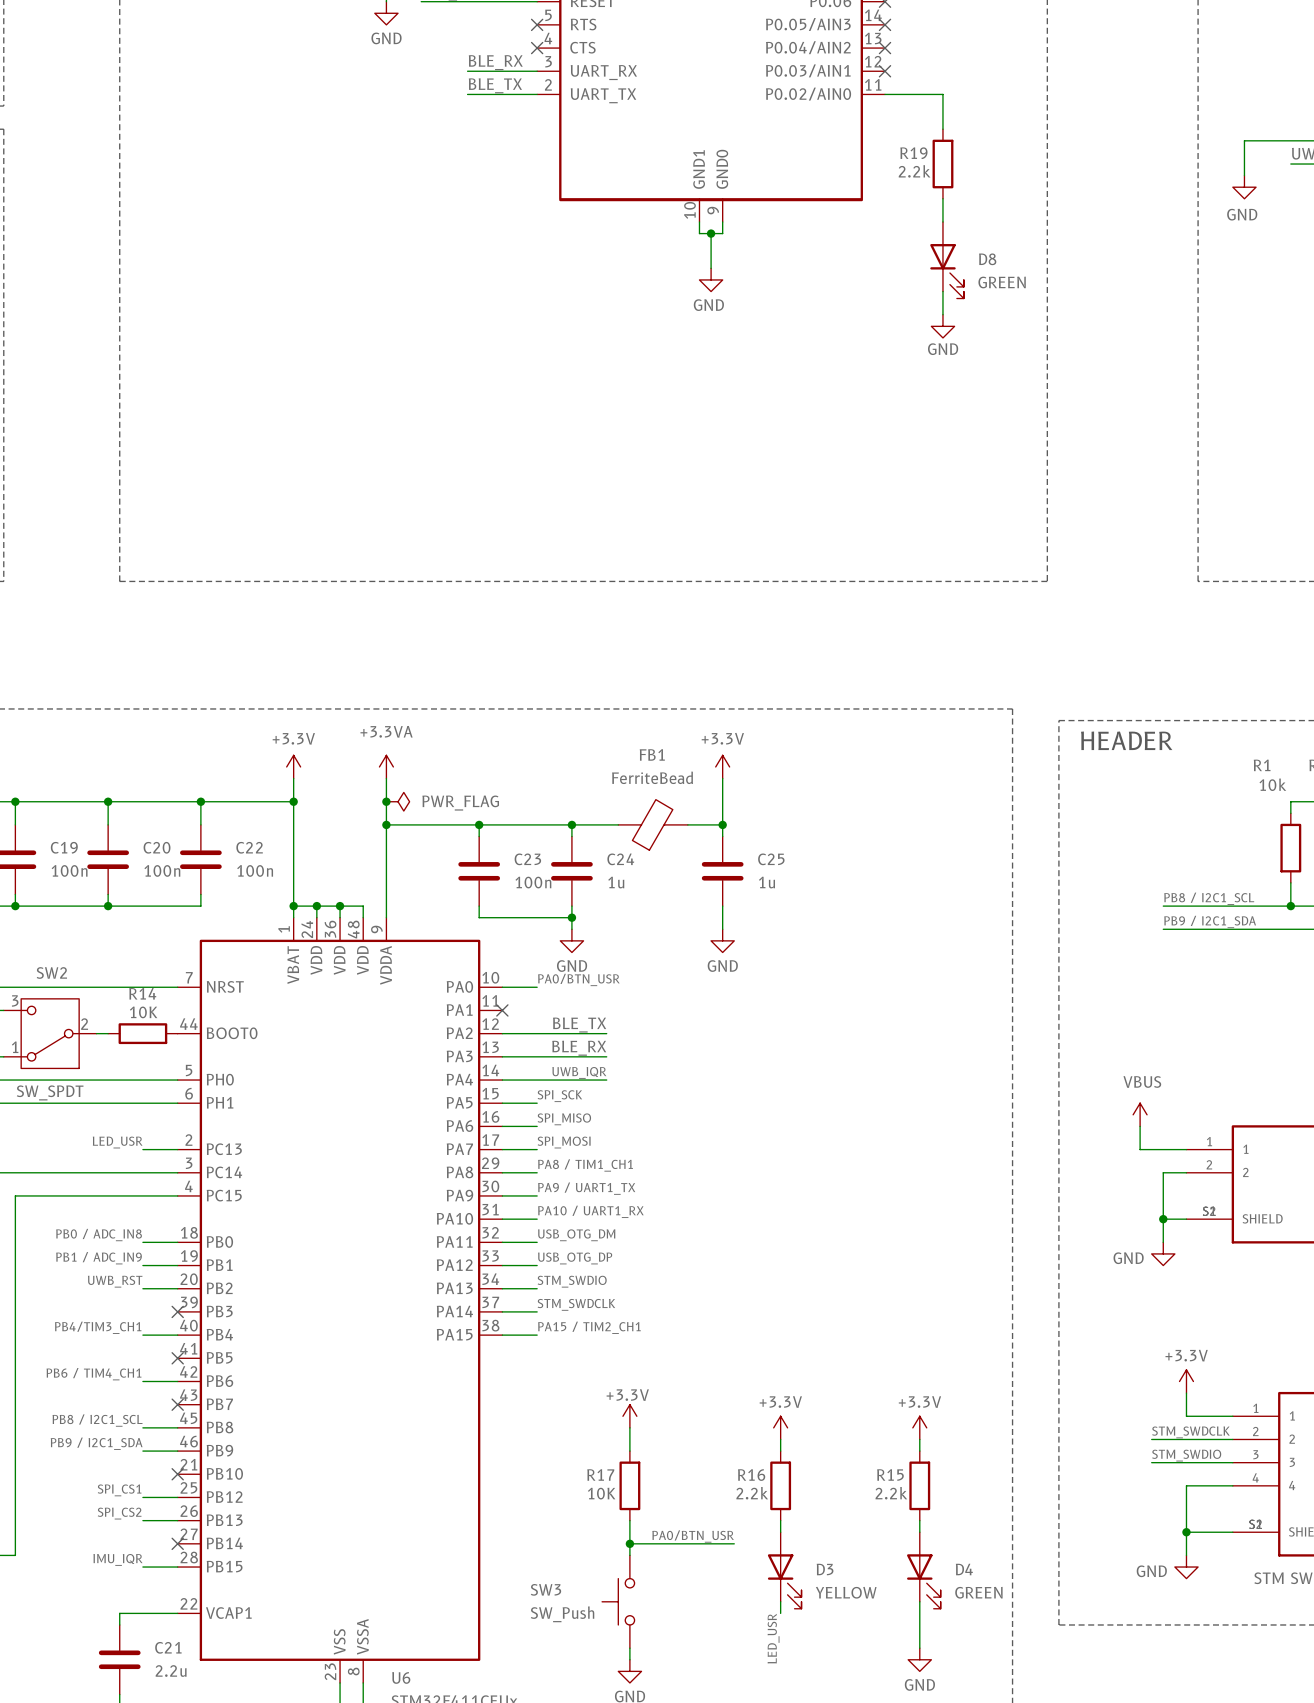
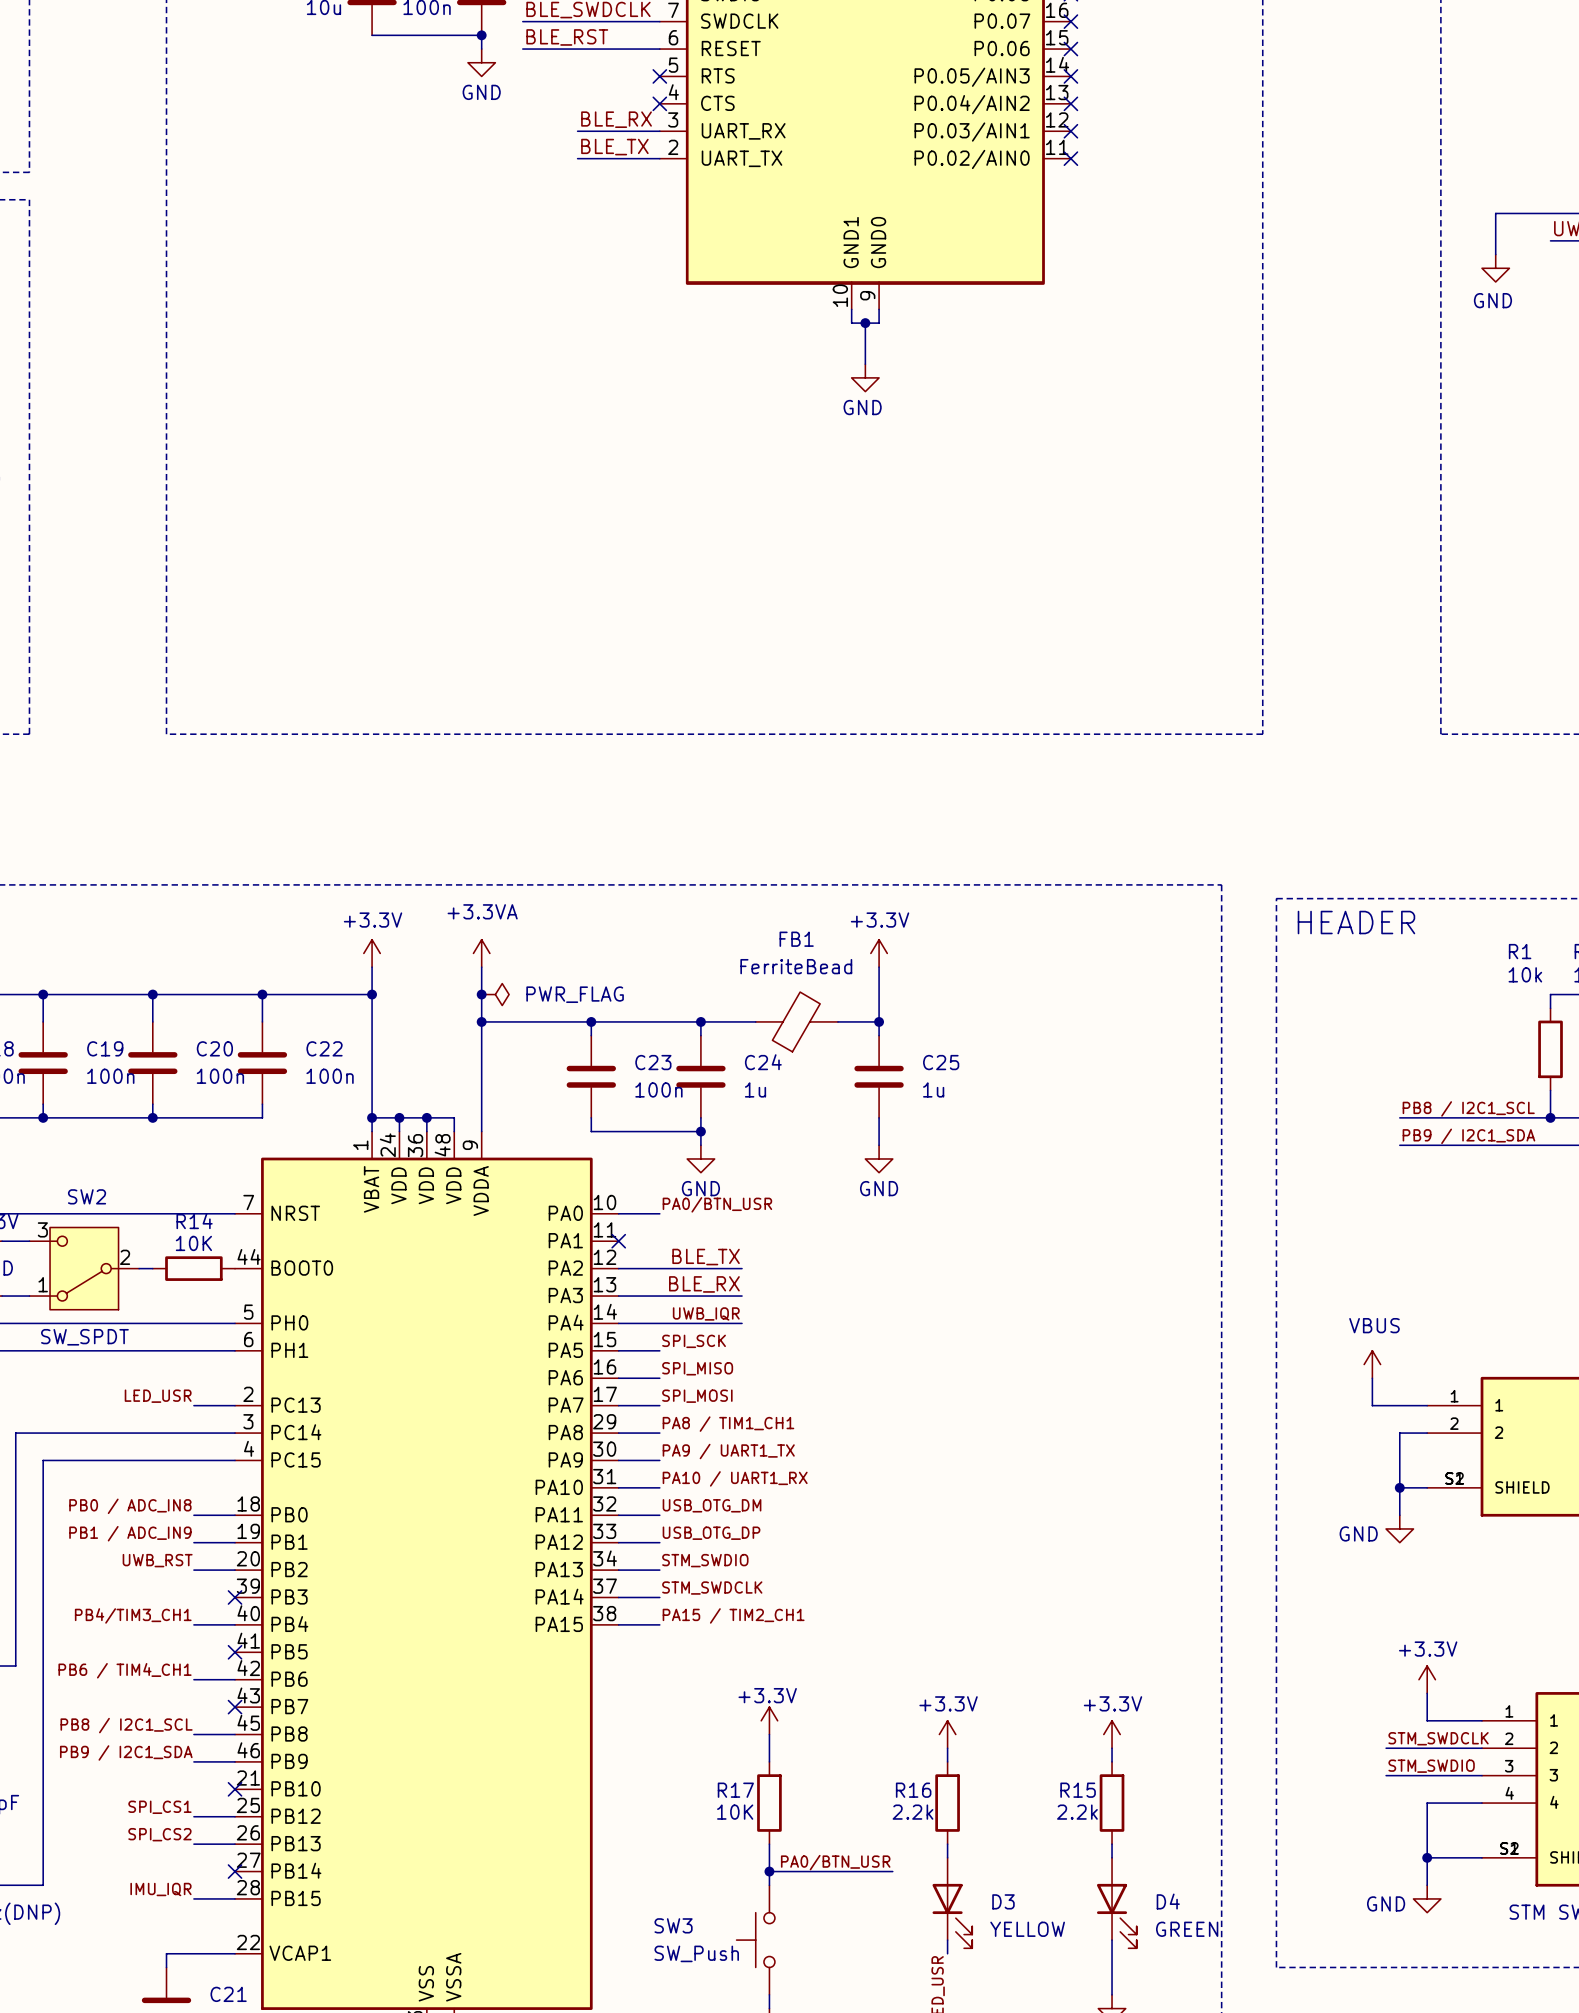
wire: (885, 94) (942, 94) (942, 129) -> none
no-connect mark: none -> (1070, 158)
R19: 2.2k (942, 164) -> none
wire: (942, 198) (942, 221) -> none
D8: GREEN (947, 260) -> none
wire: (942, 291) (942, 314) -> none
power symbol: GND (942, 326) -> none

